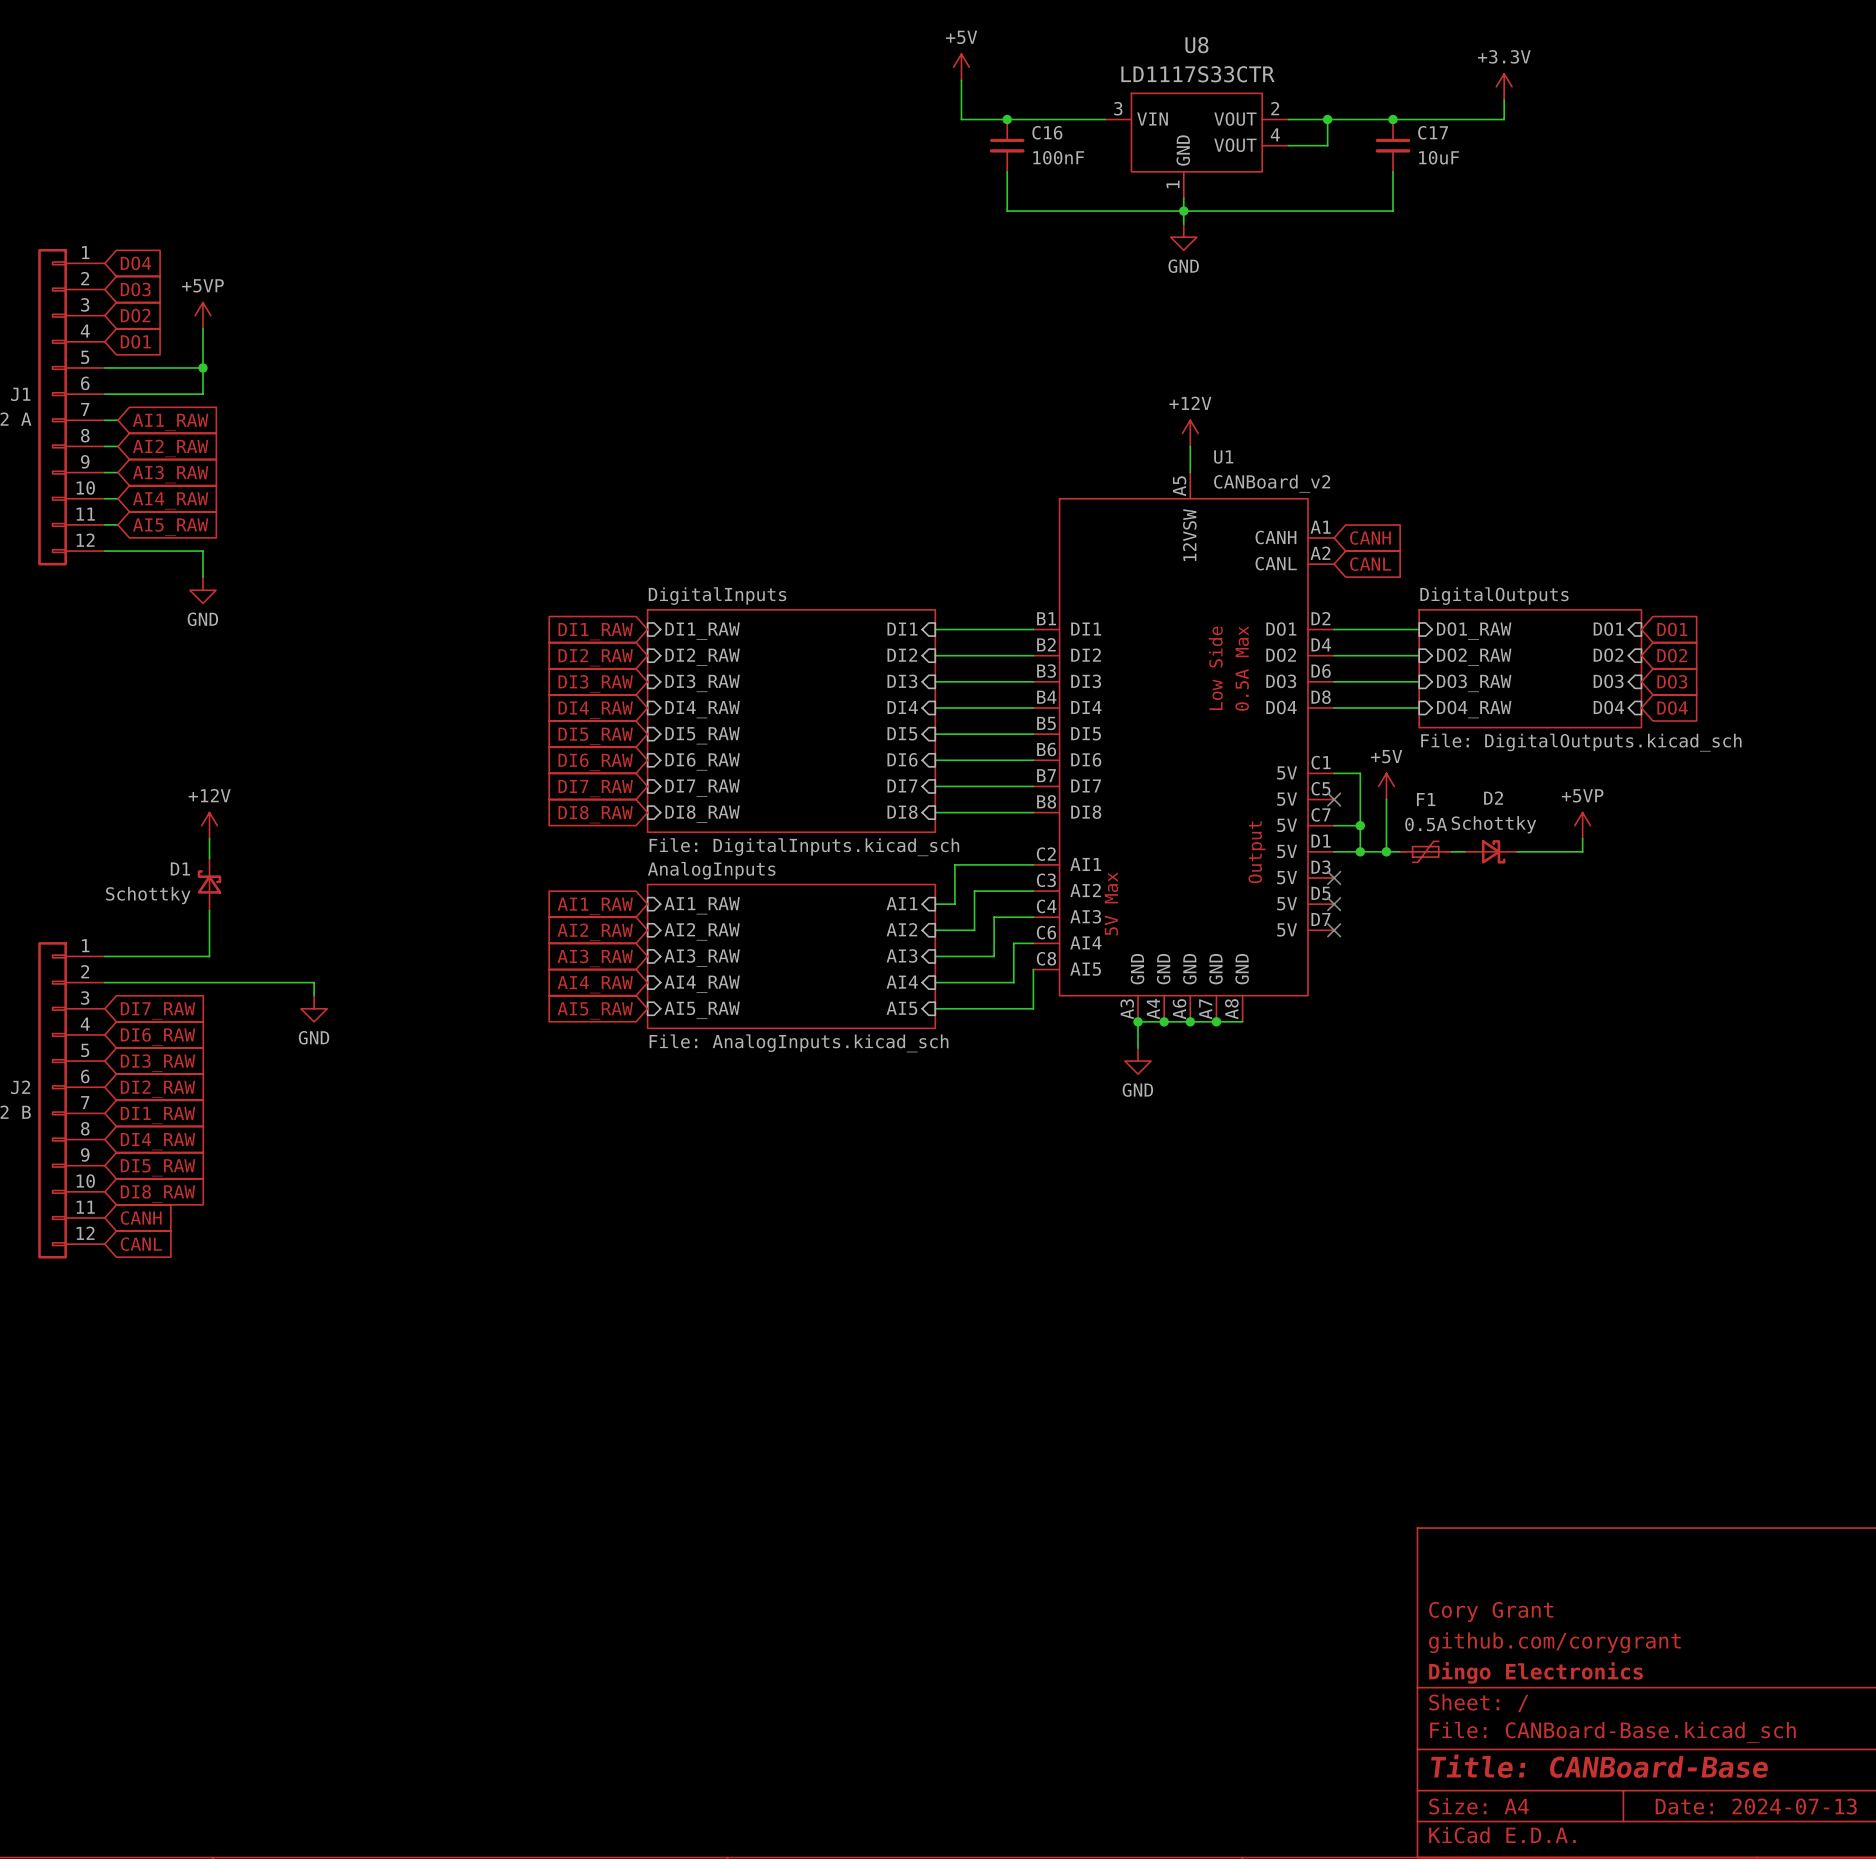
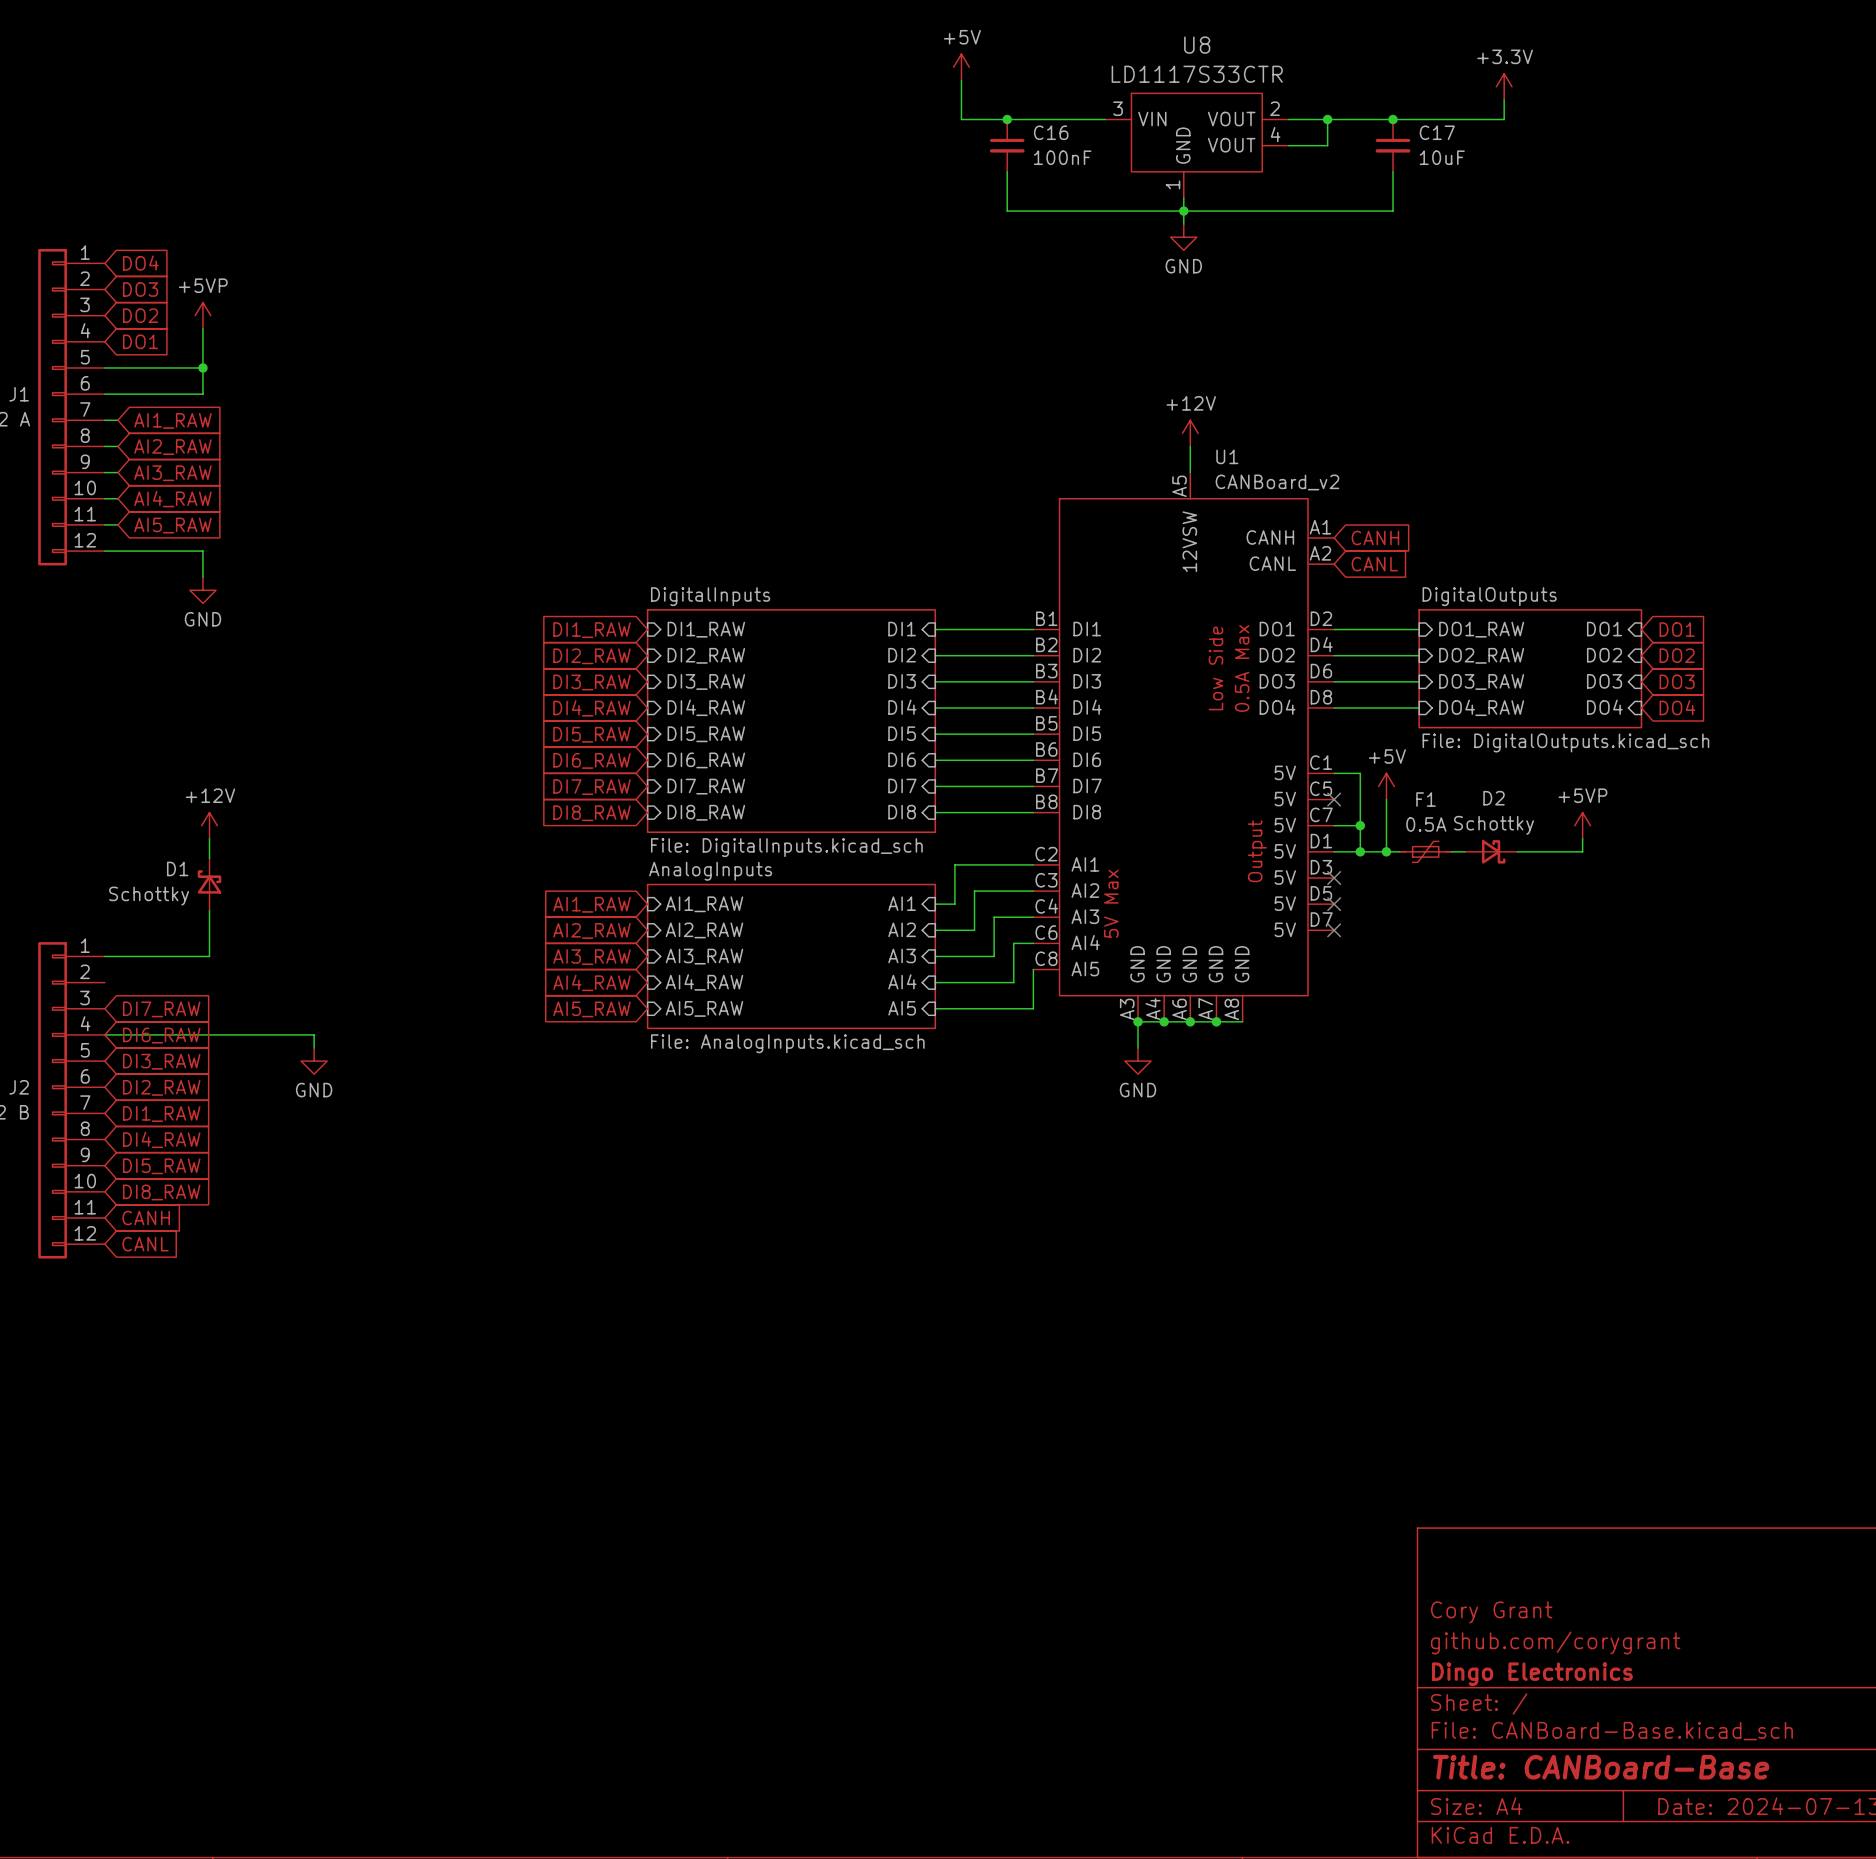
wire: (104, 982) (314, 982) (314, 995) -> (104, 1034) (314, 1034) (314, 1048)
power symbol position: GND (314, 1008) -> GND (314, 1061)

